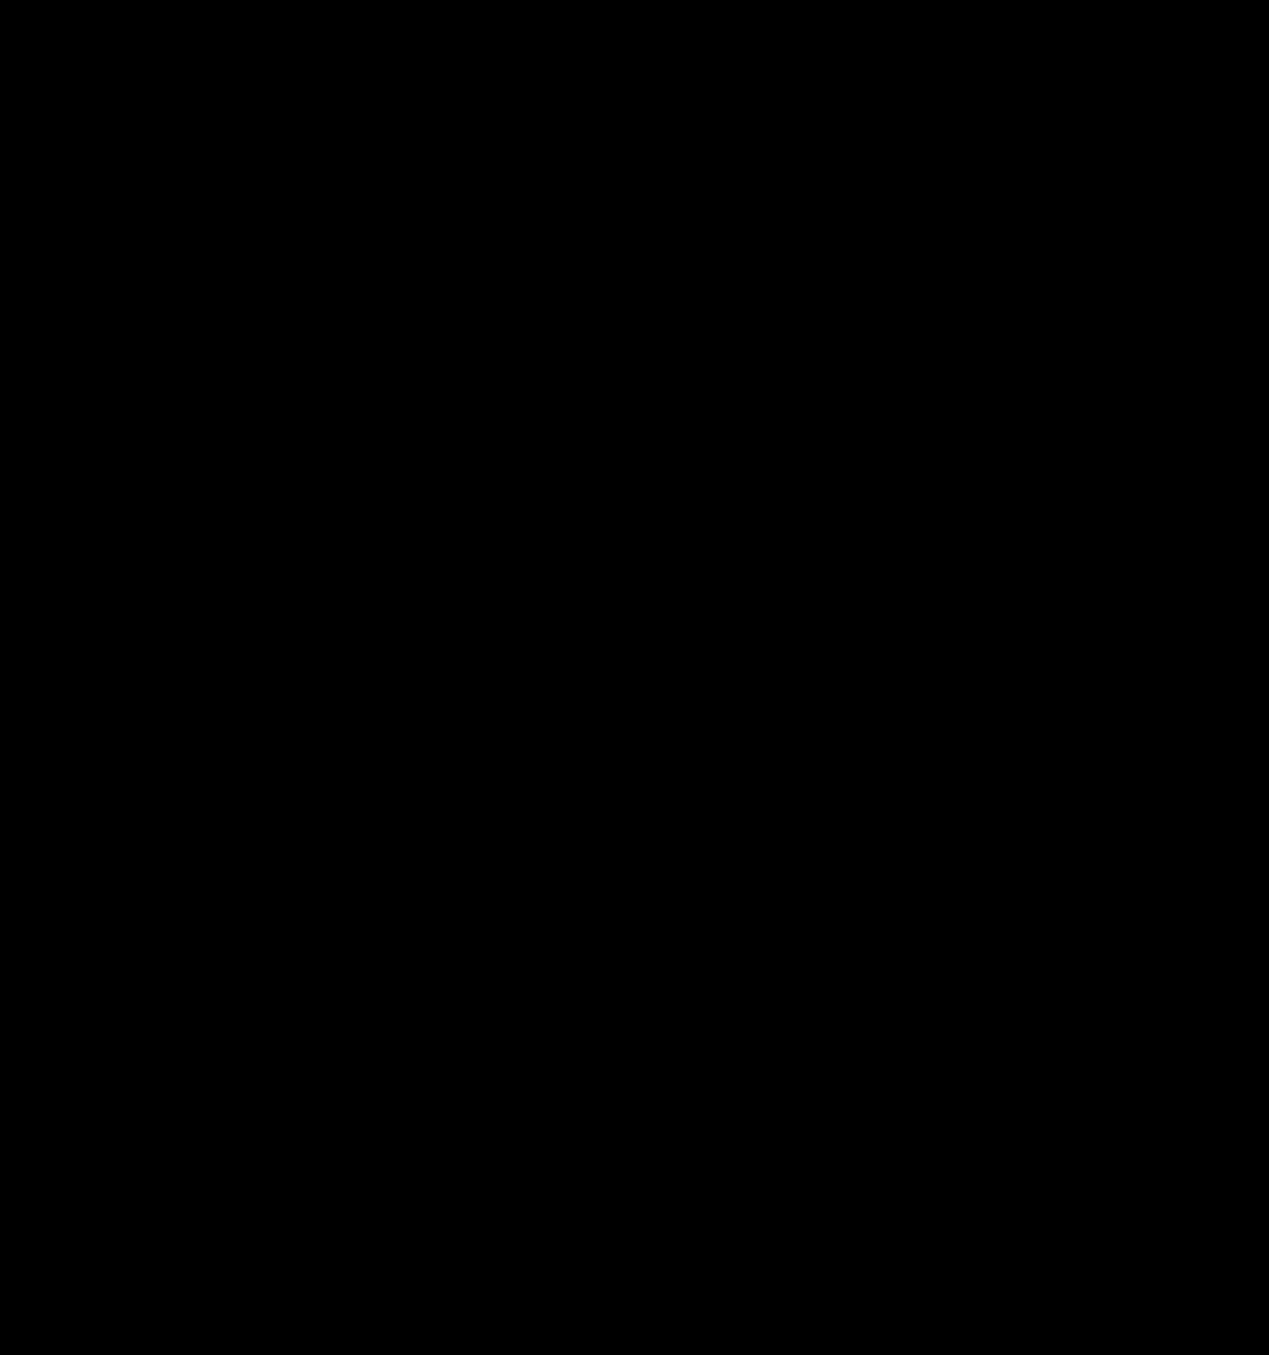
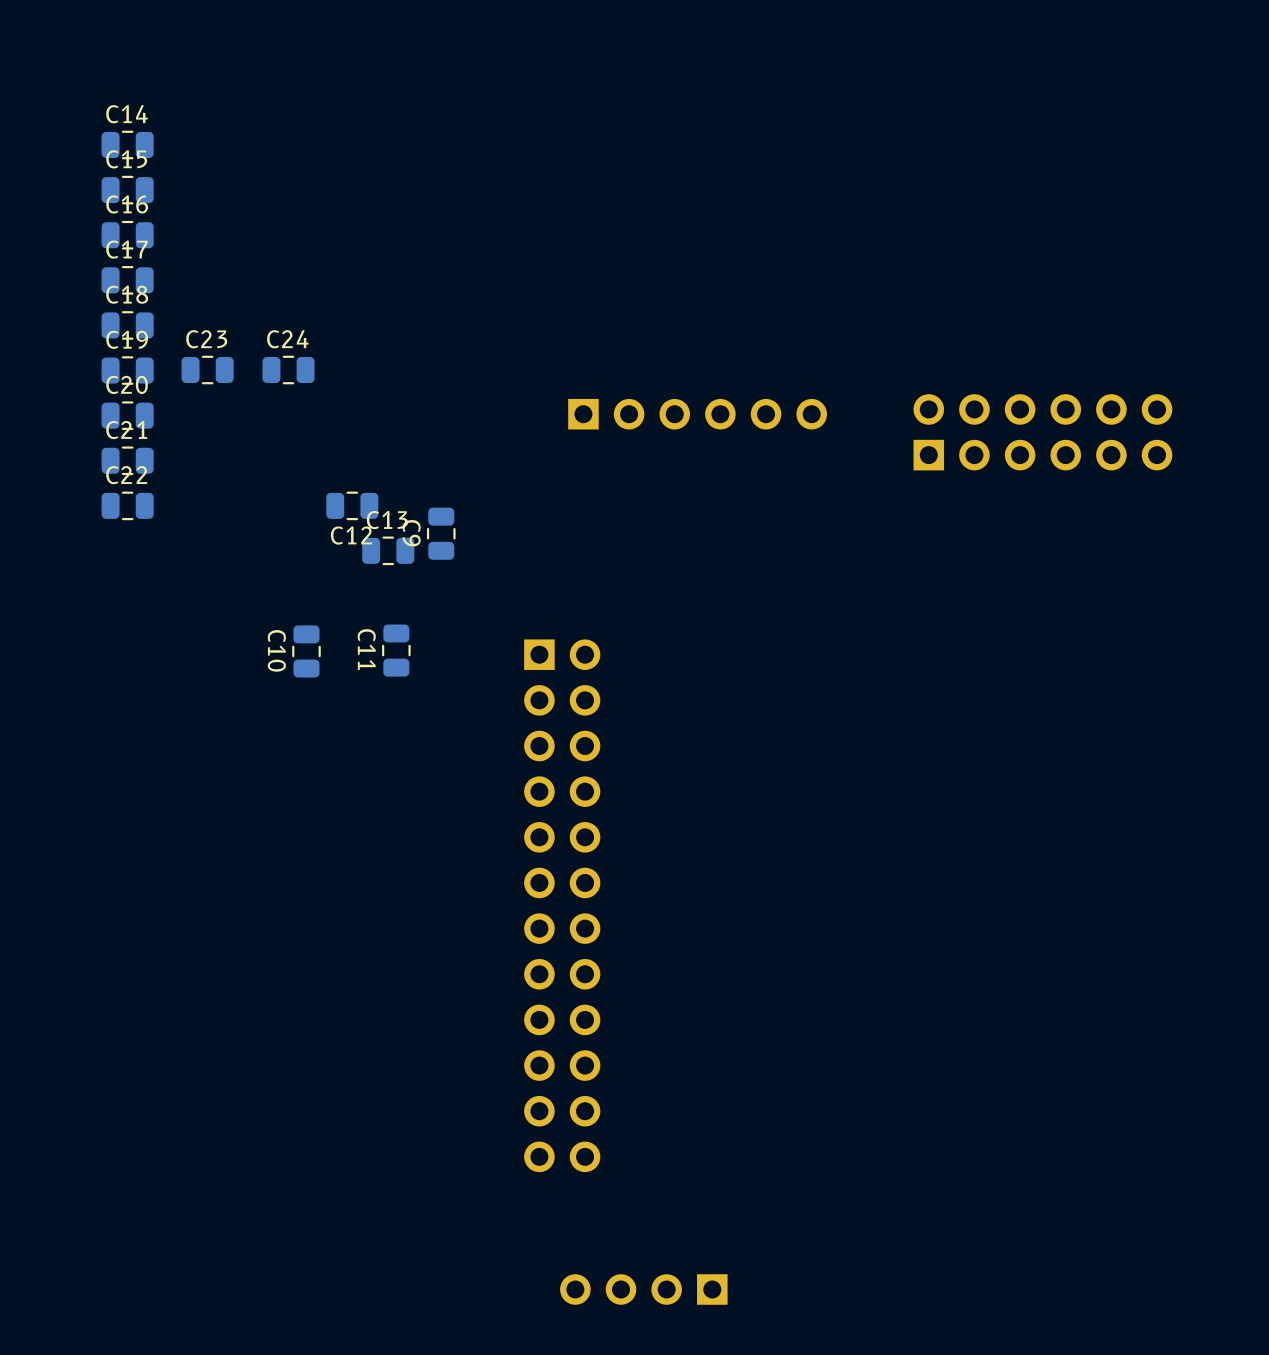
C14: none -> (127, 144)
C15: none -> (127, 190)
C16: none -> (127, 235)
C17: none -> (127, 280)
C18: none -> (127, 325)
C19: none -> (127, 370)
C23: none -> (207, 370)
C24: none -> (288, 370)
part: none -> (697, 414)
C20: none -> (127, 415)
part: none -> (1042, 432)
C21: none -> (127, 460)
C22: none -> (127, 505)
C12: none -> (352, 505)
C9: none -> (441, 533)
C13: none -> (388, 550)
C11: none -> (396, 650)
C10: none -> (306, 651)
part: none -> (562, 905)
part: none -> (643, 1289)

